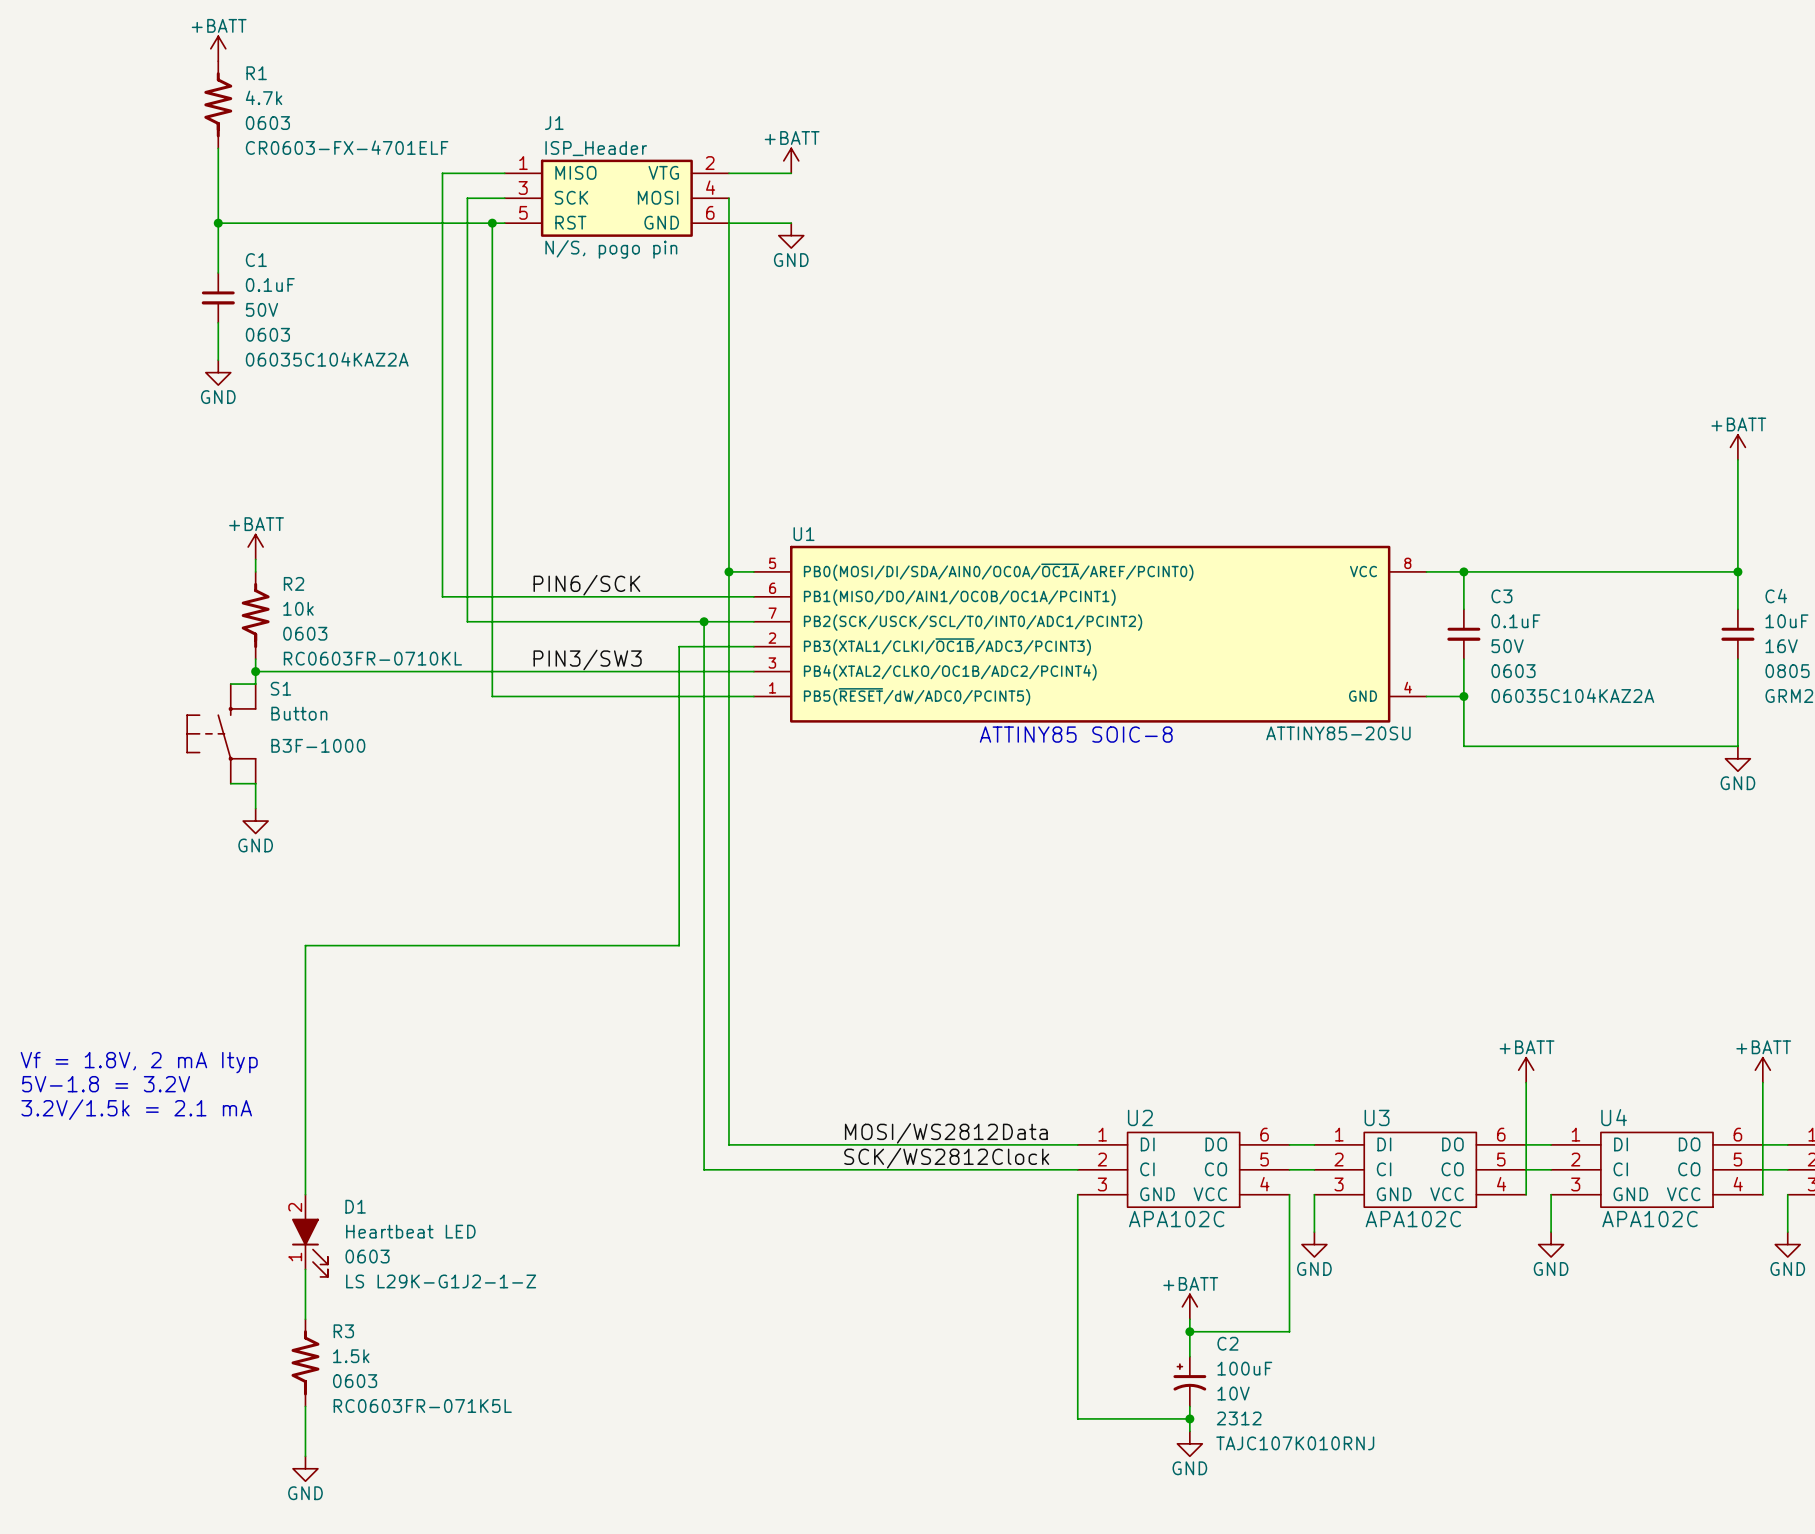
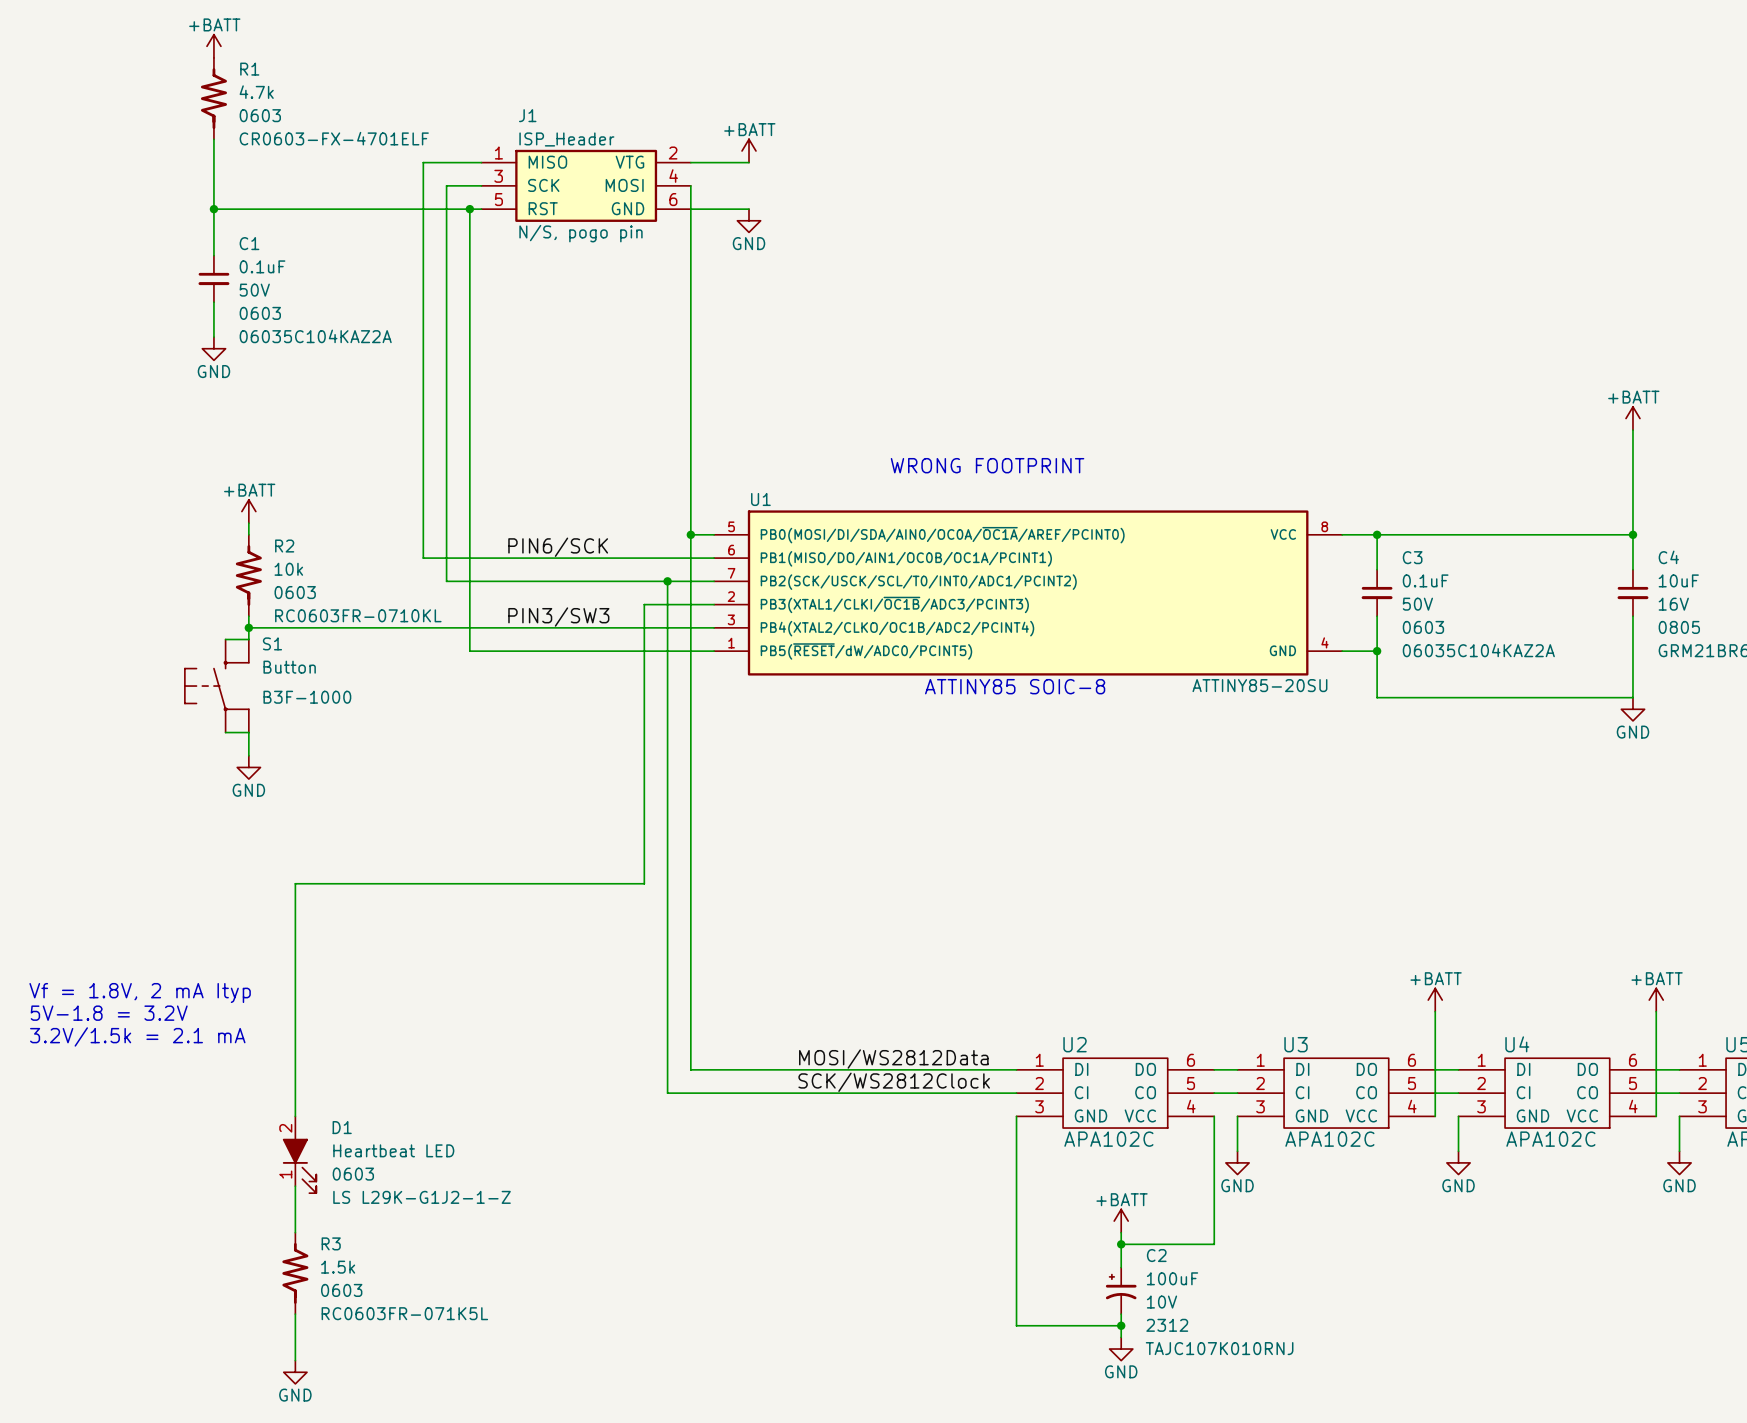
text: none -> WRONG FOOTPRINT (987, 465)

